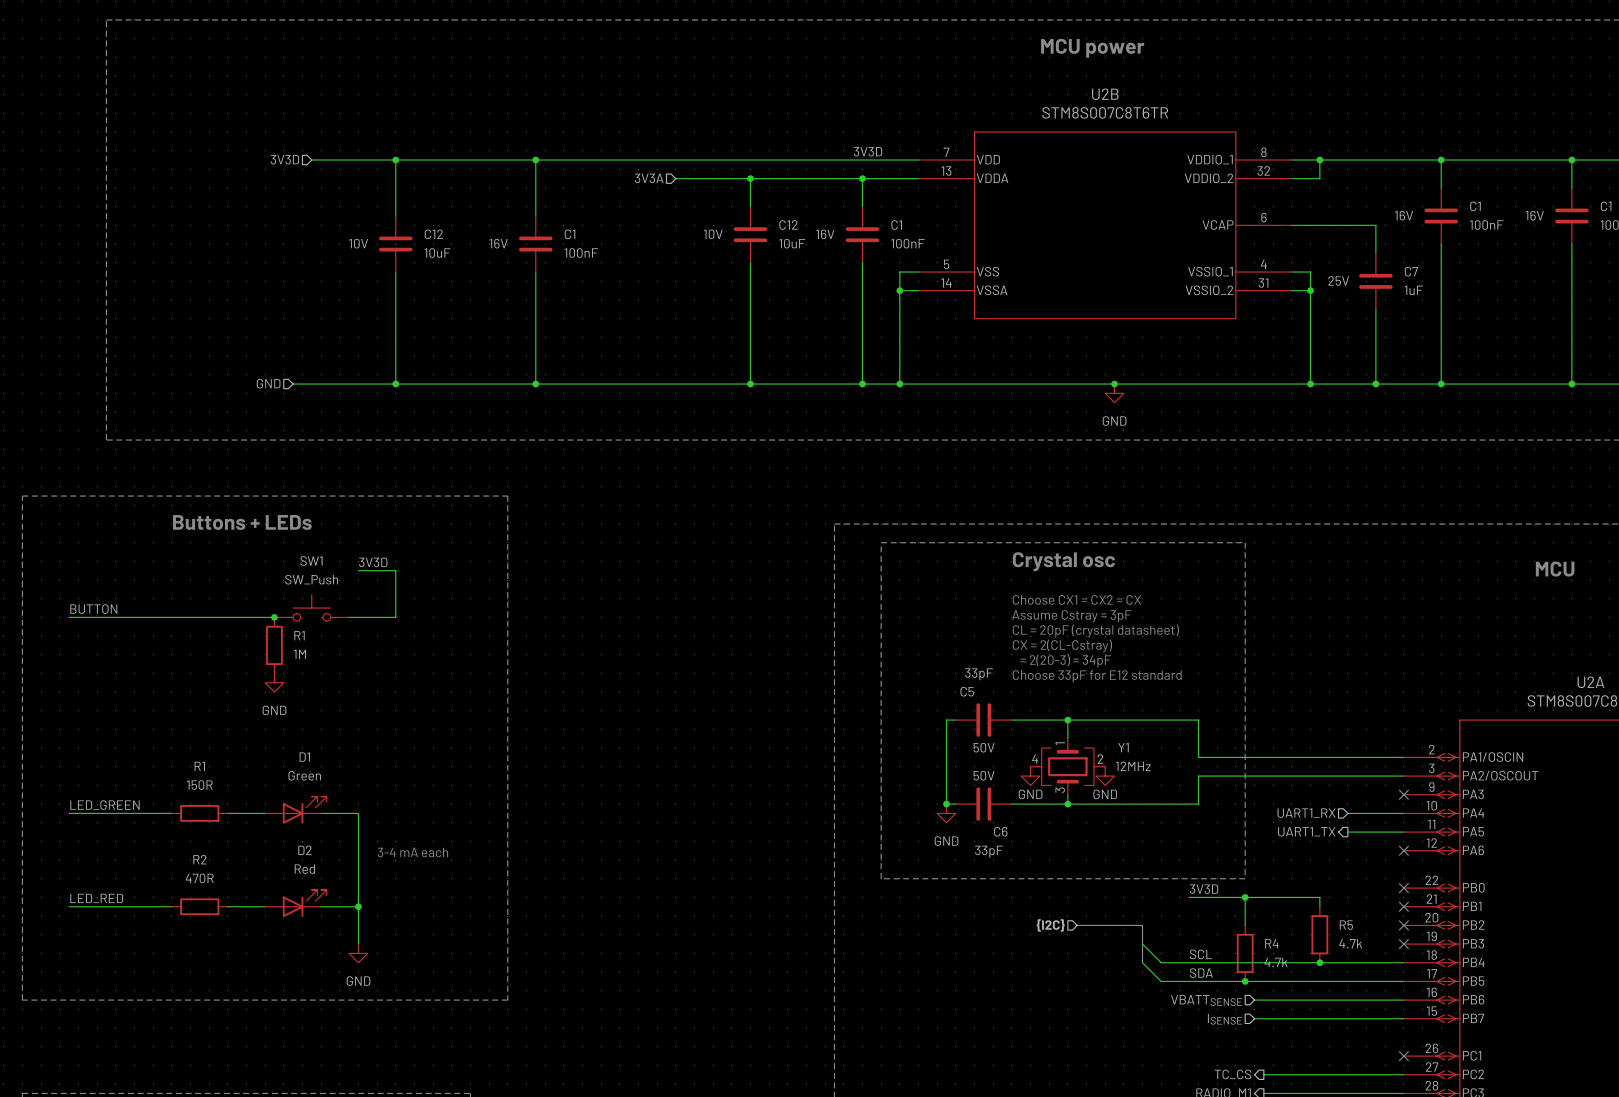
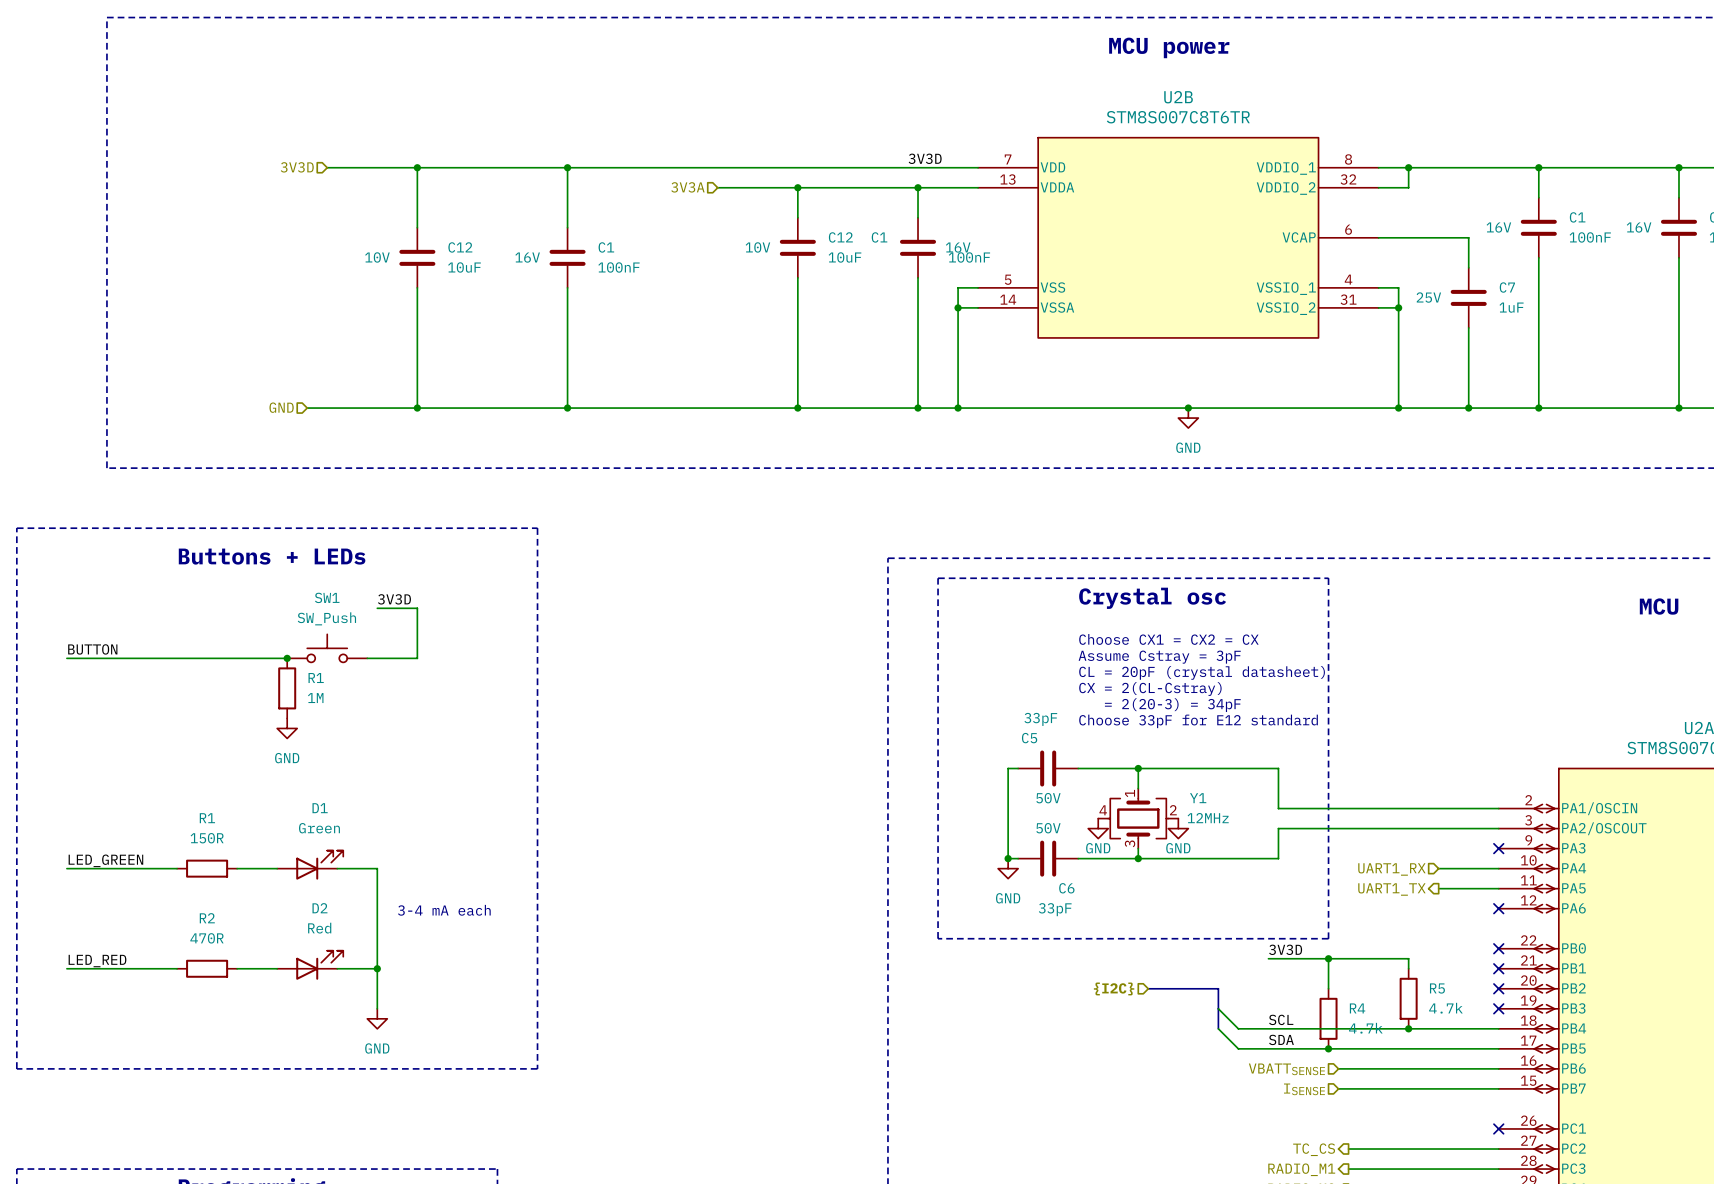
C1 name position: C1 (896, 225) -> C1 (879, 237)
C1 text position: 16V (825, 234) -> 16V (958, 247)

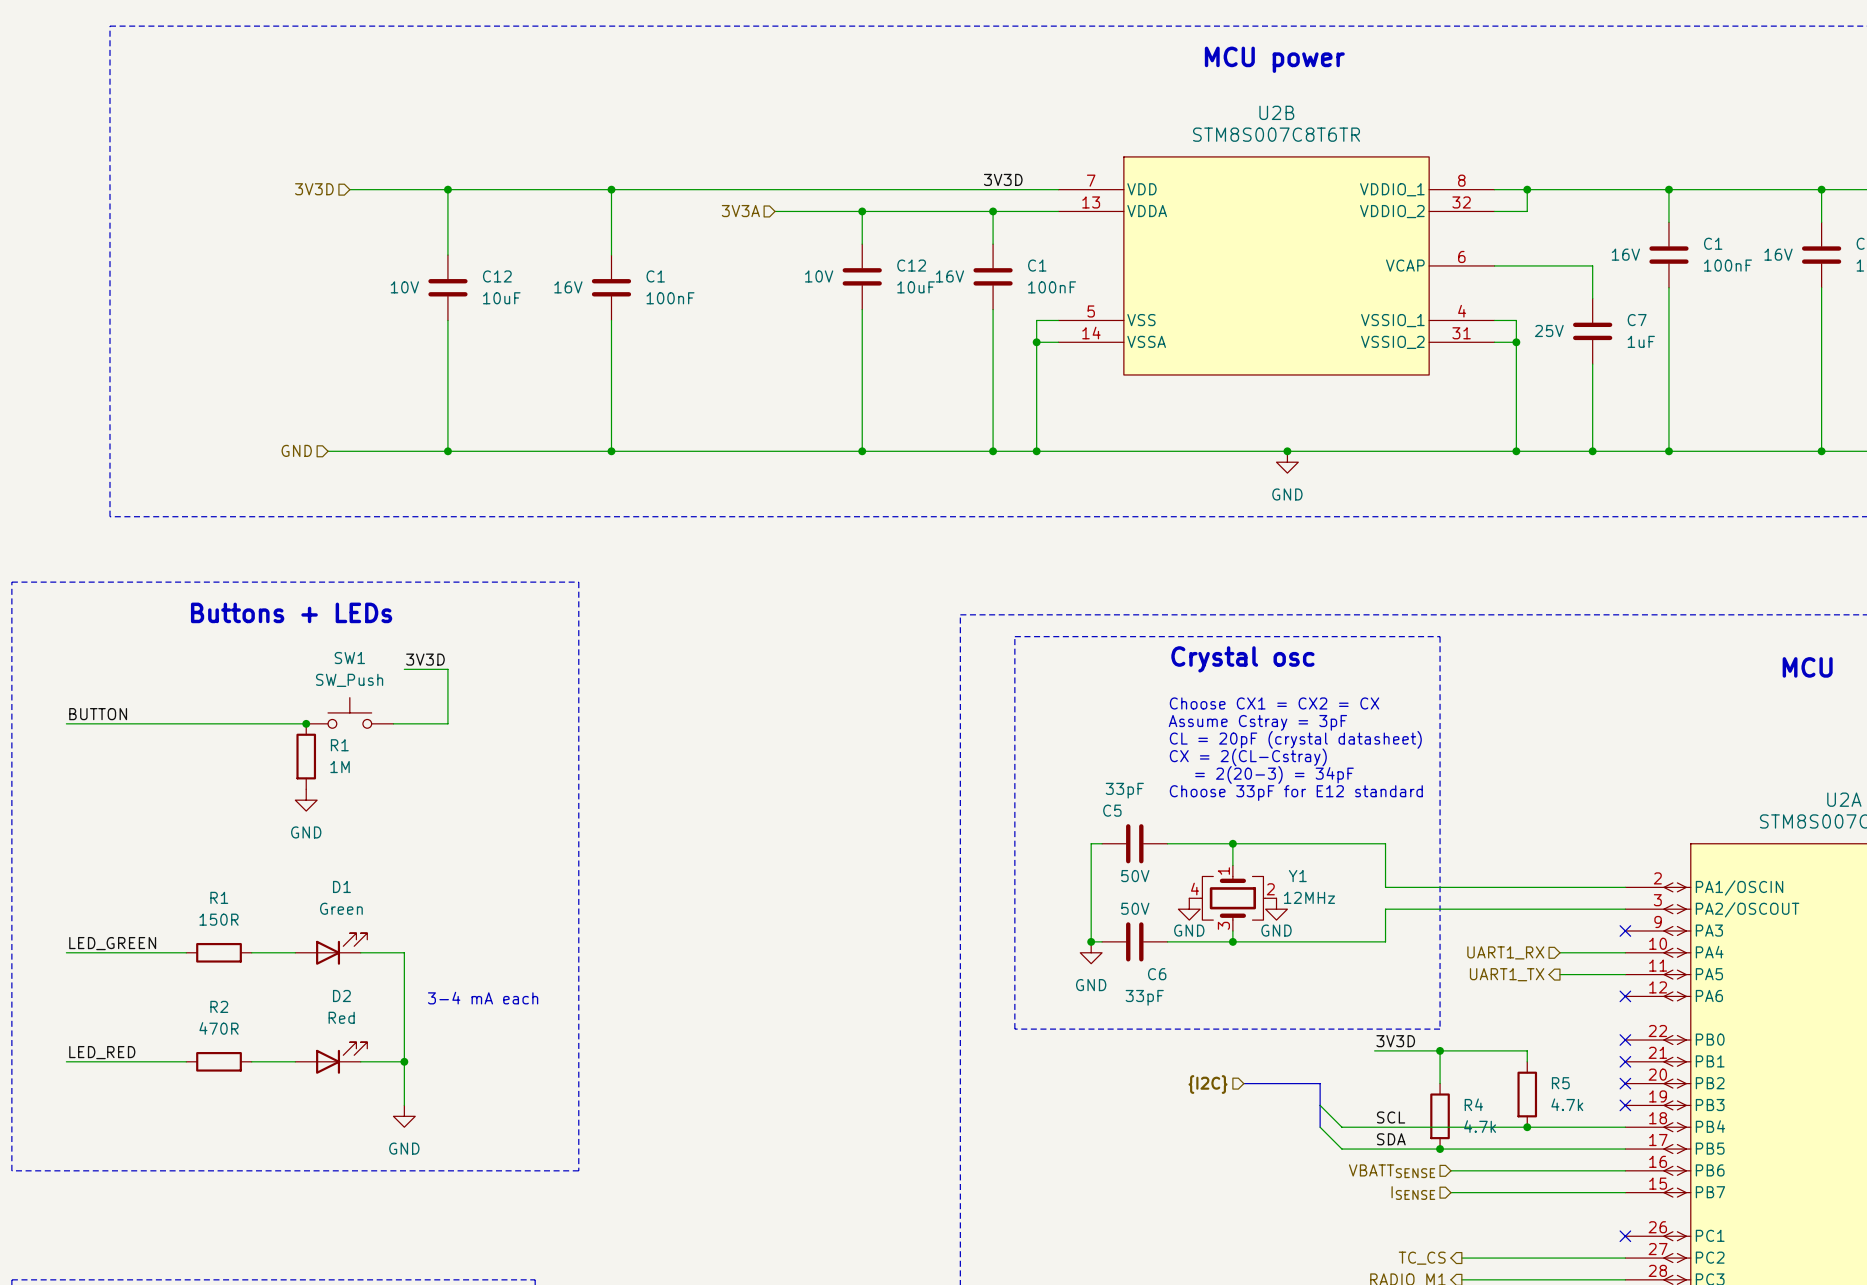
C1 name position: C1 (879, 237) -> C1 (1037, 265)
C1 text position: 16V (958, 247) -> 16V (949, 276)

